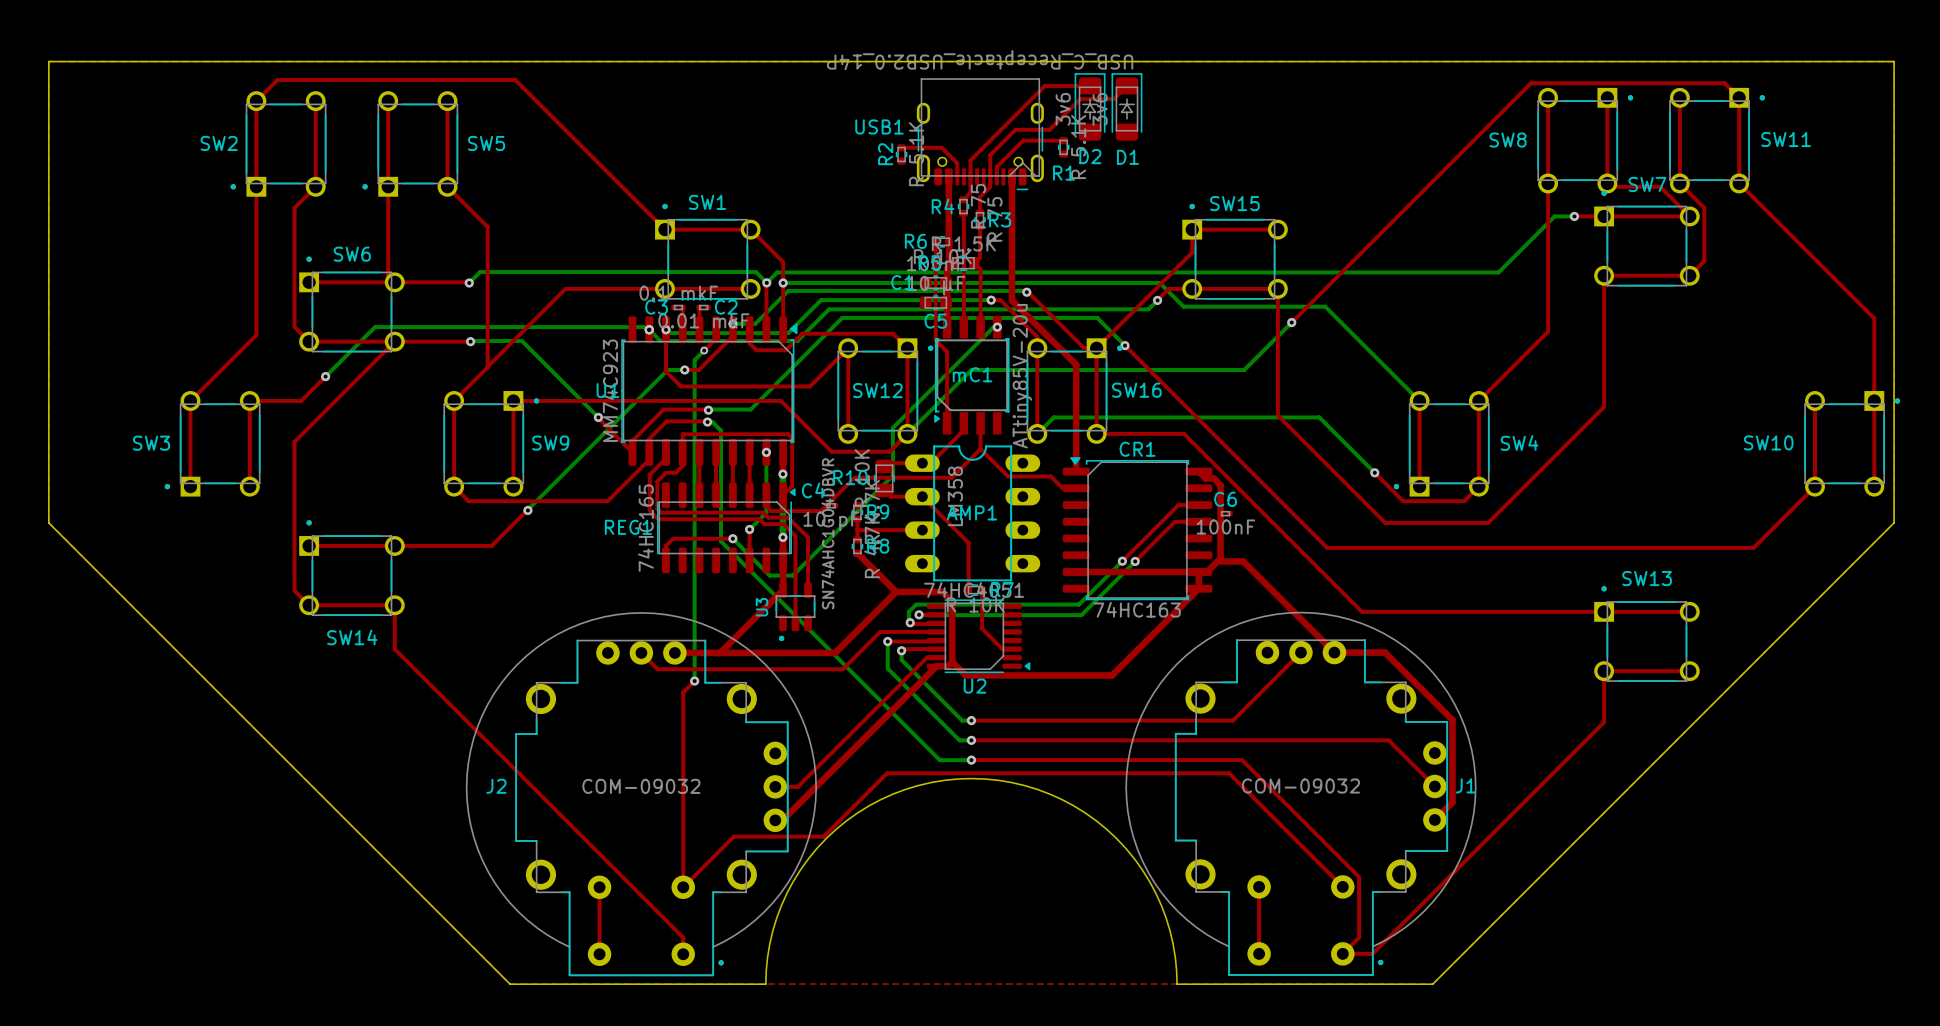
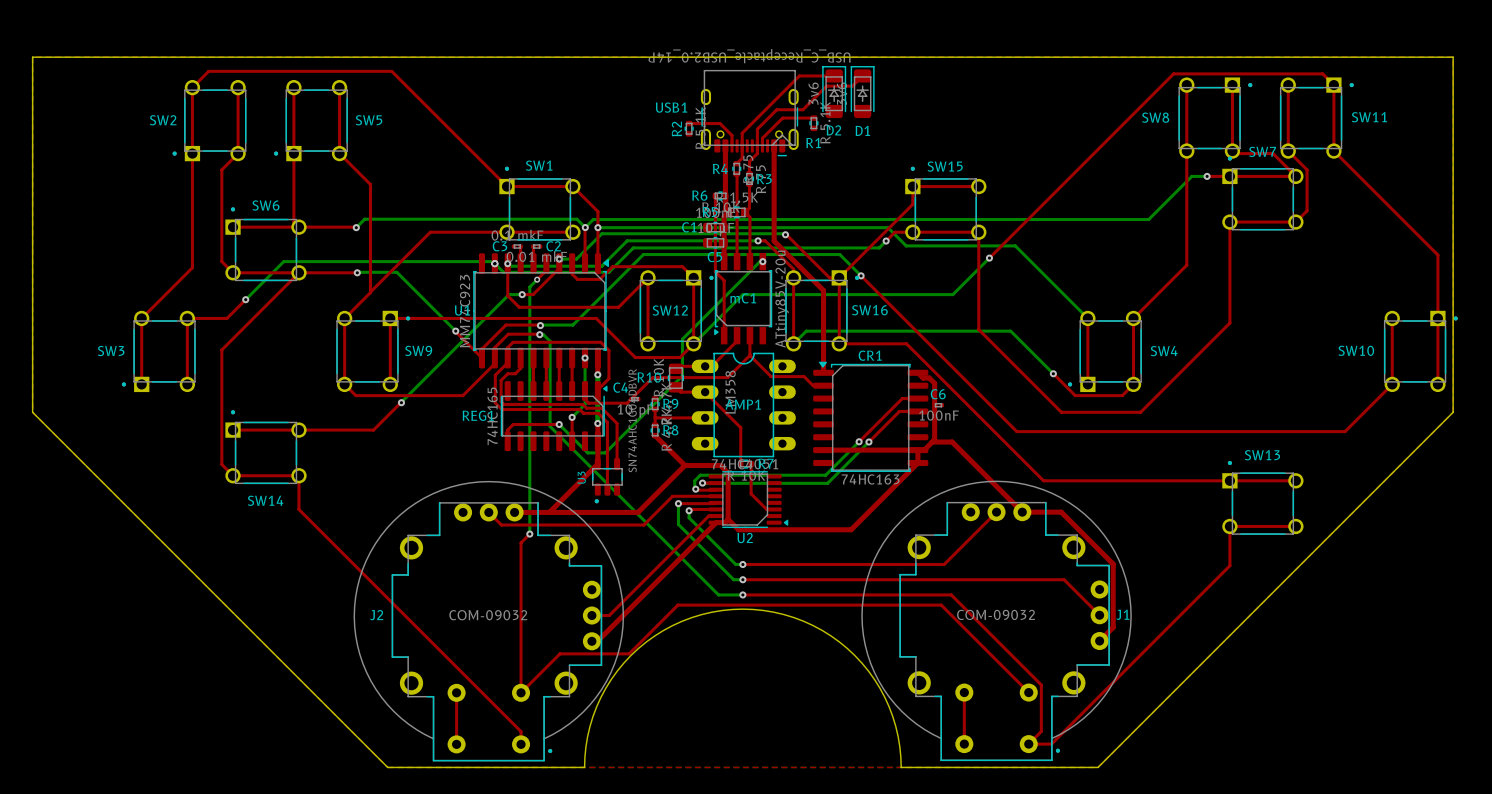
top track: none -> (507, 358) (507, 347) (513, 342) (600, 342) (608, 350) (608, 378) (597, 389)
top track: (682, 452) (683, 434) (787, 434) (792, 438) (792, 486) (783, 495) -> none

